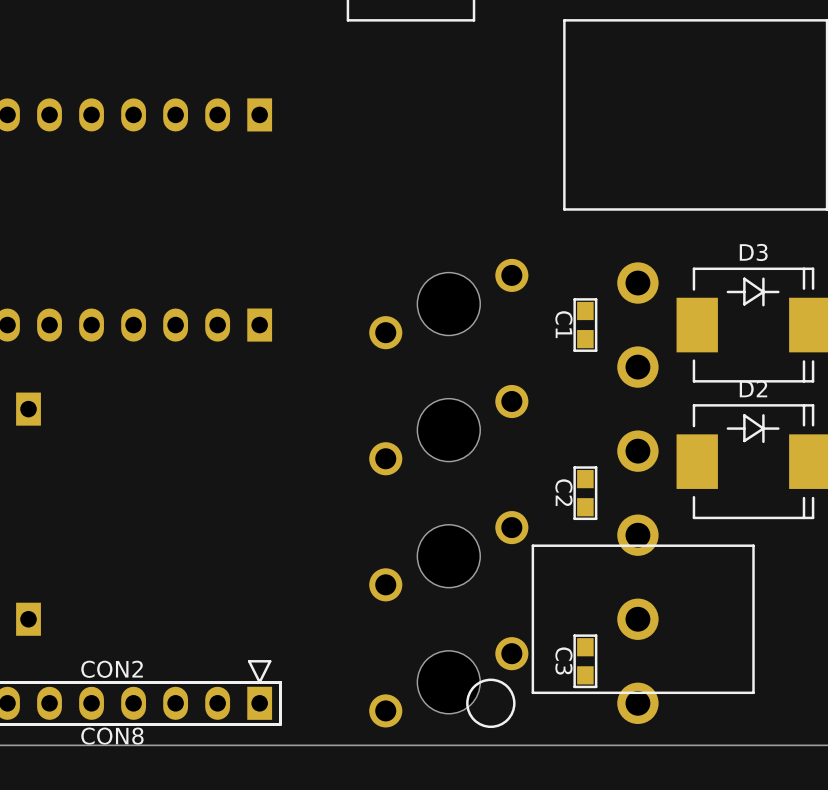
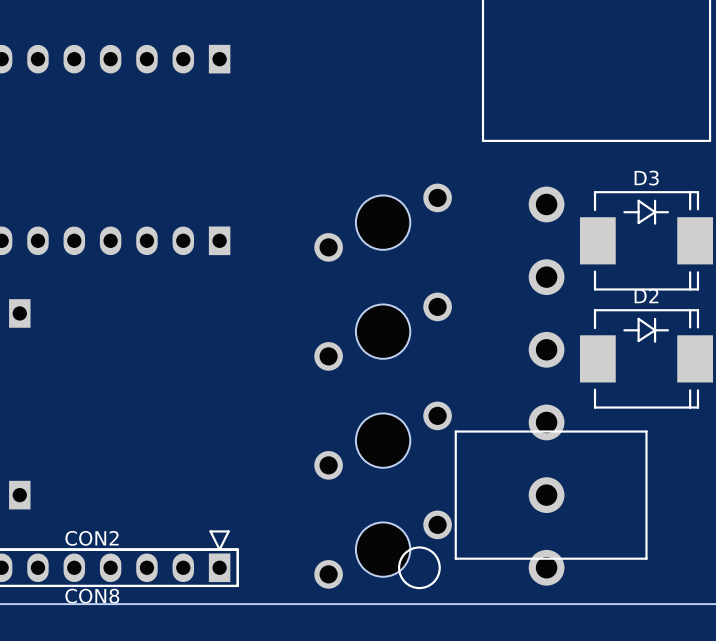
C1: (585, 325) -> none
C2: (585, 493) -> none
C3: (585, 661) -> none

